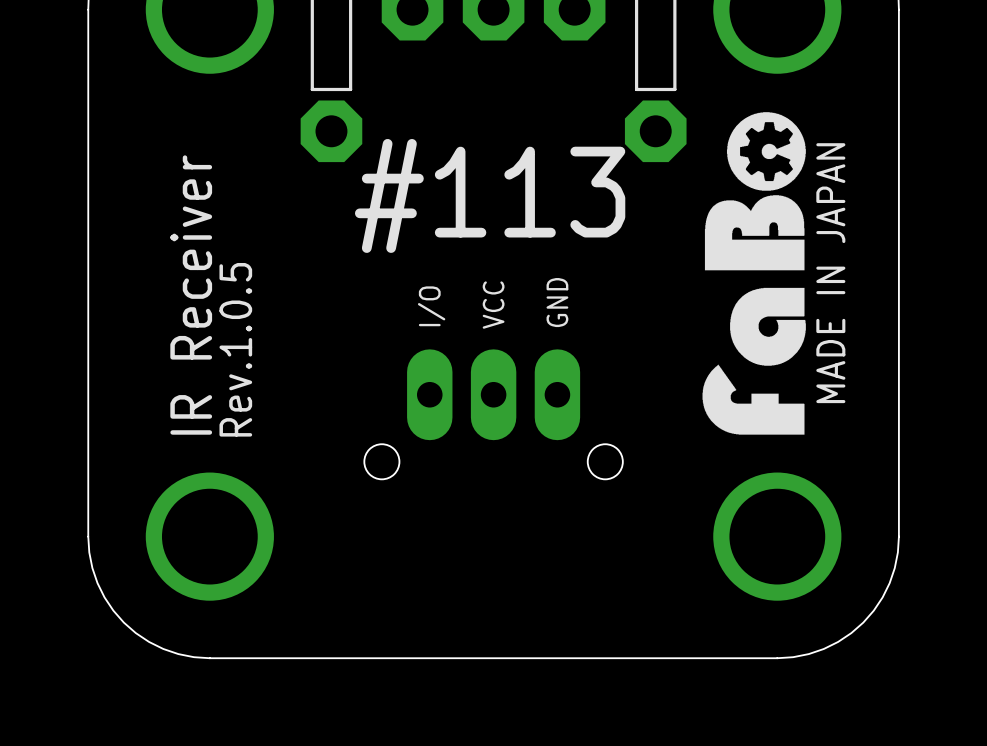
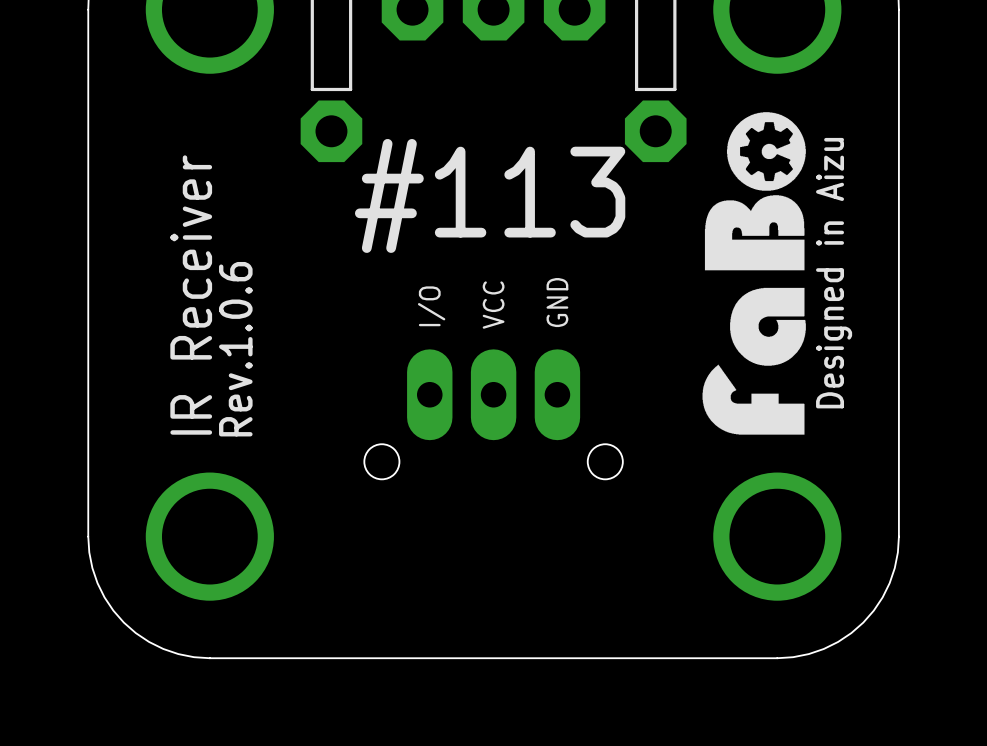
text: MADE IN JAPAN (830, 273) -> Designed in Aizu (834, 273)
text: Rev.1.0.5 (235, 349) -> Rev.1.0.6 (235, 349)

